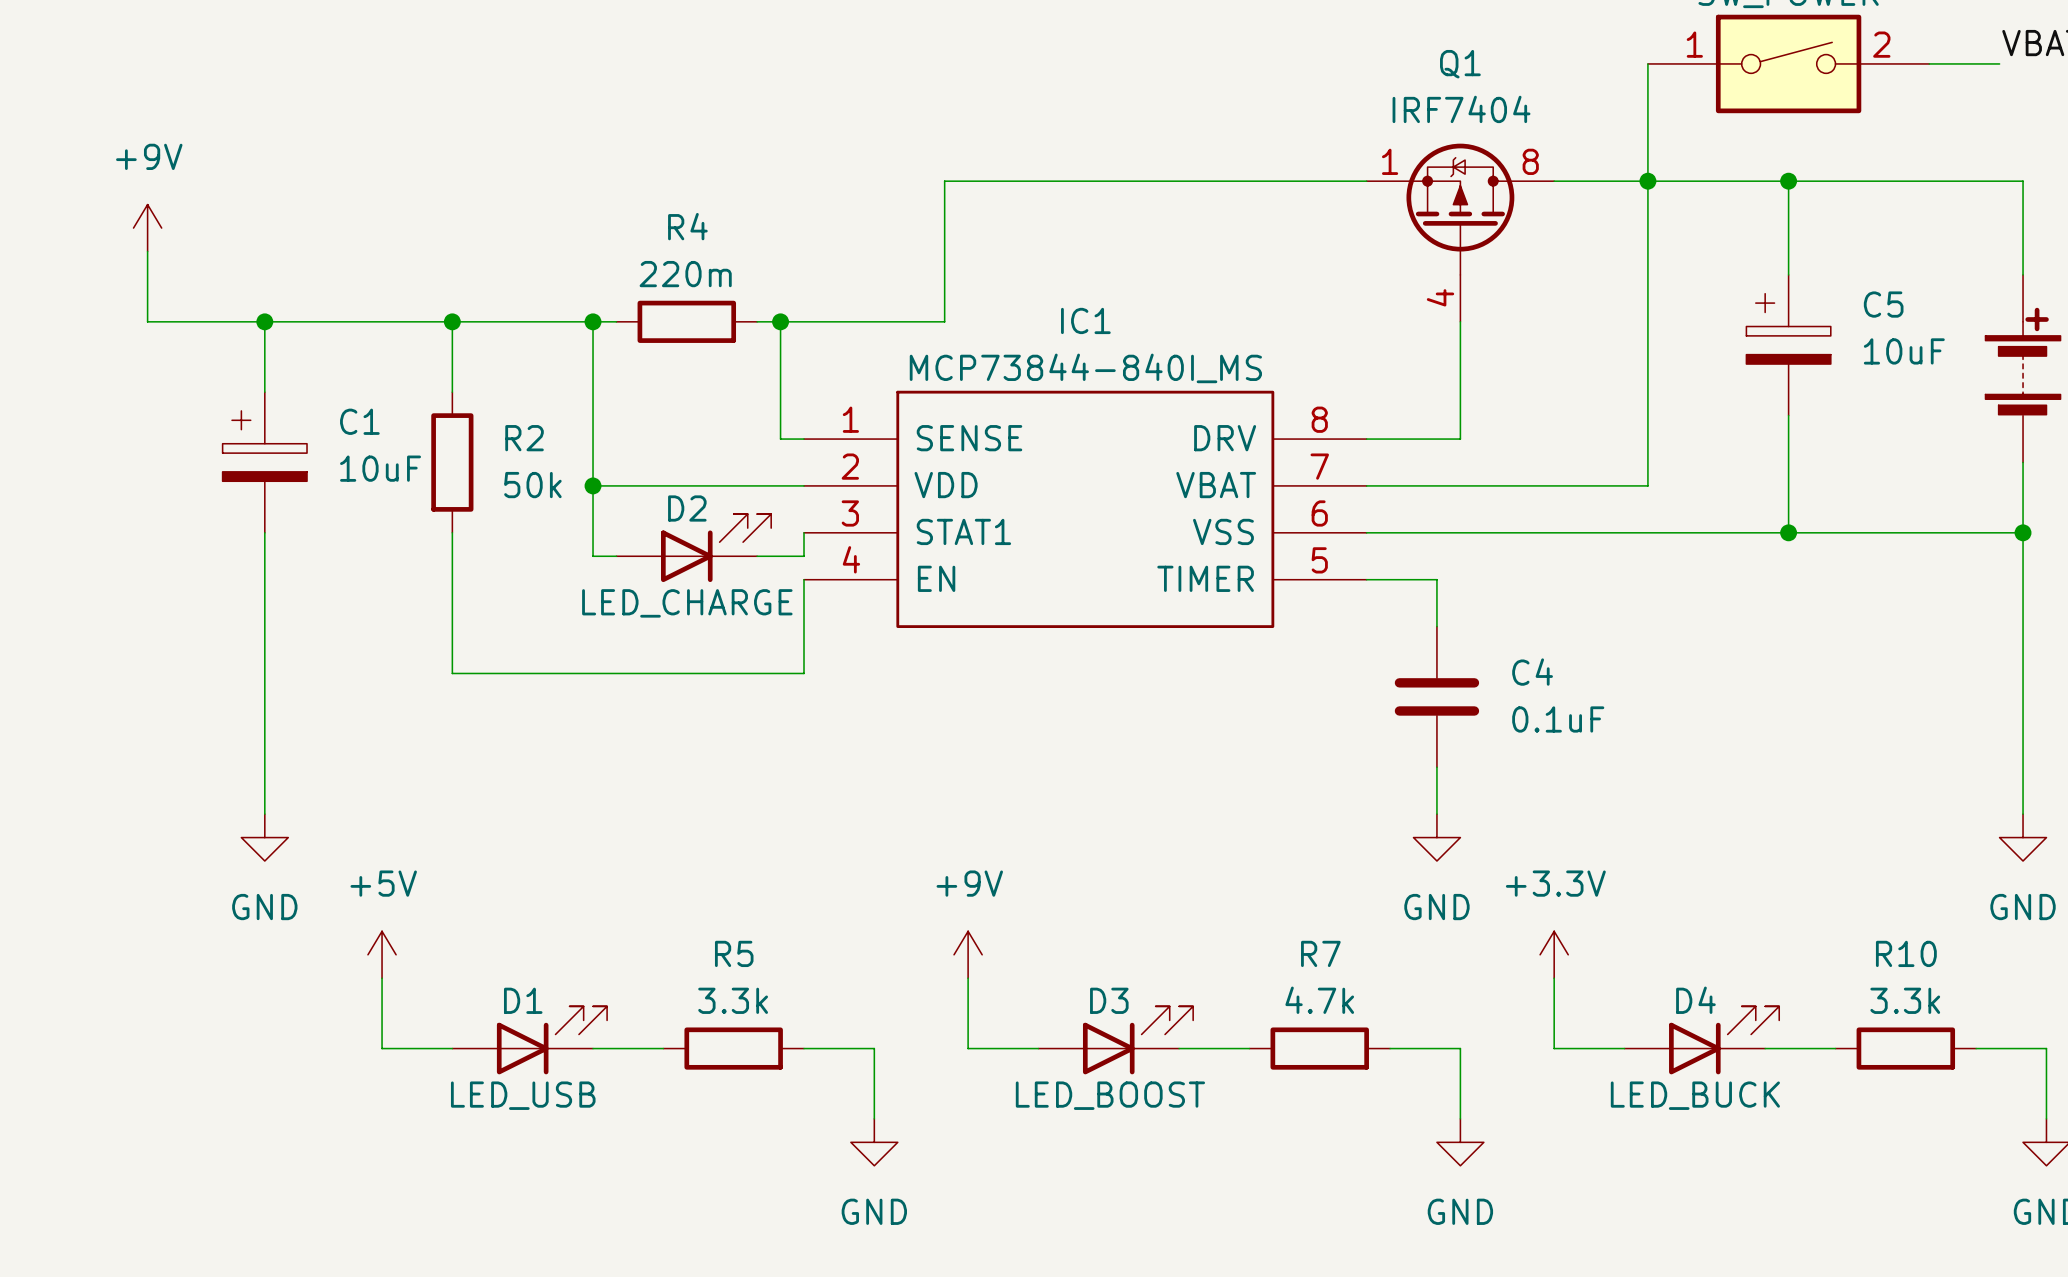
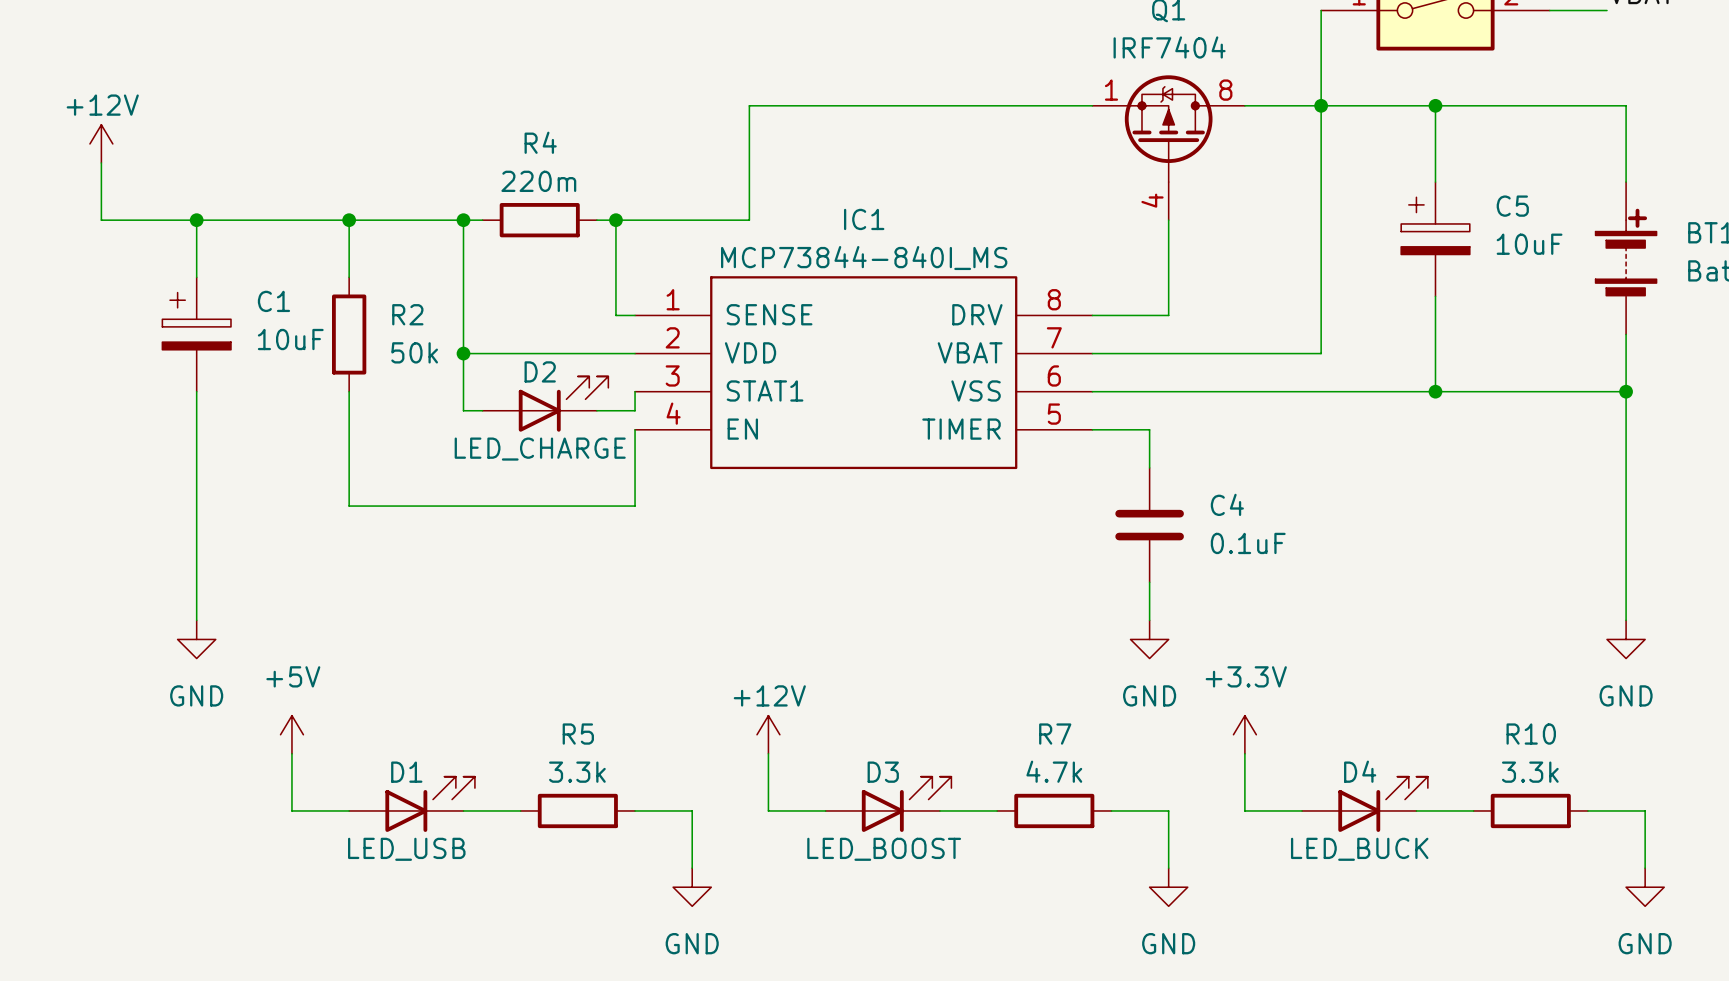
power symbol: +9V (147, 228) -> +12V (101, 143)
power symbol: +9V (968, 954) -> +12V (768, 734)

